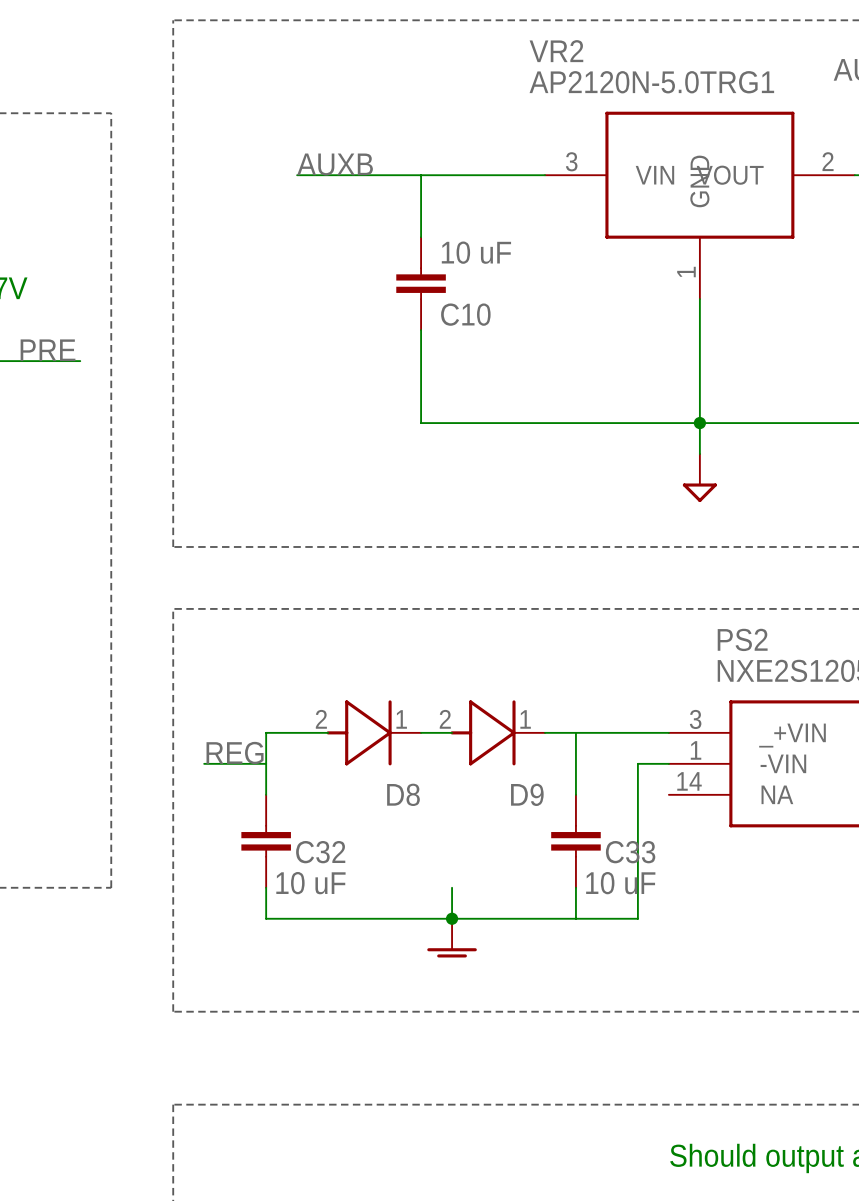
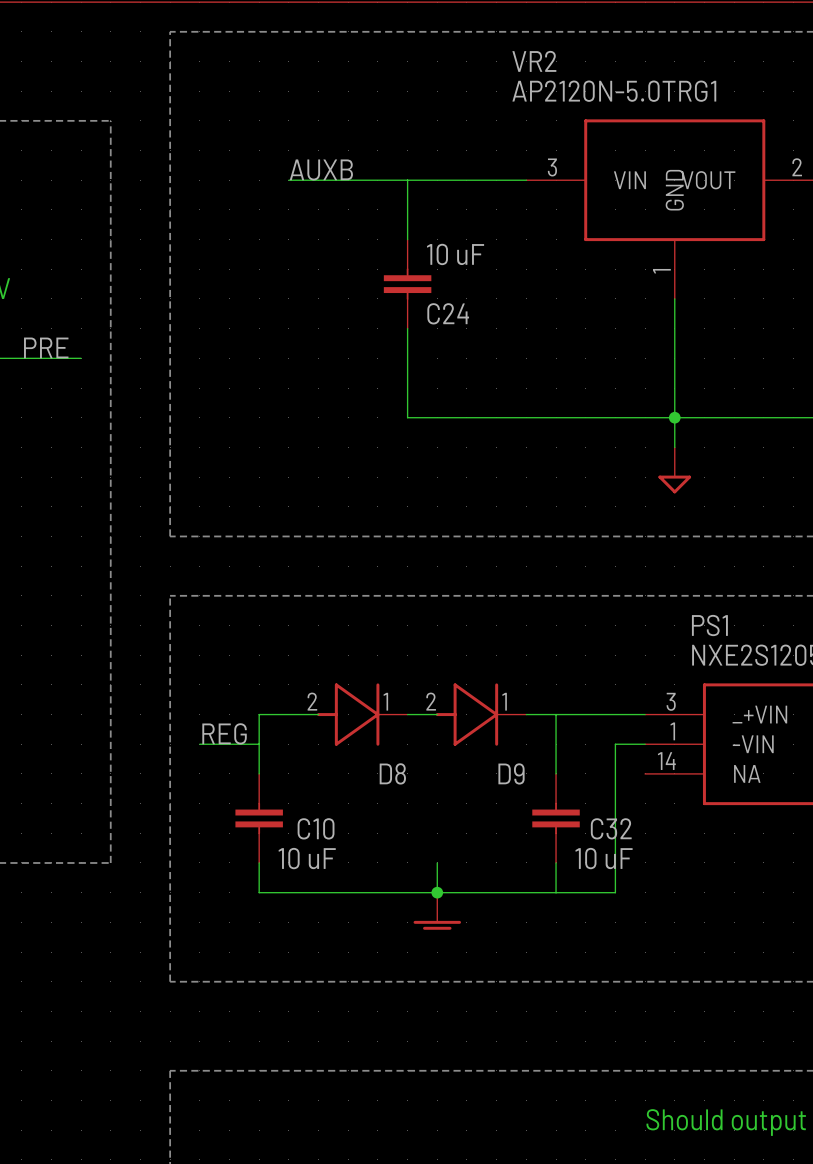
C10 name: C10 (465, 314) -> C24 (448, 313)
PS2 name: PS2 (742, 639) -> PS1 (709, 625)
C32 name: C32 (320, 852) -> C10 (316, 828)
C33 name: C33 (630, 852) -> C32 (611, 828)

